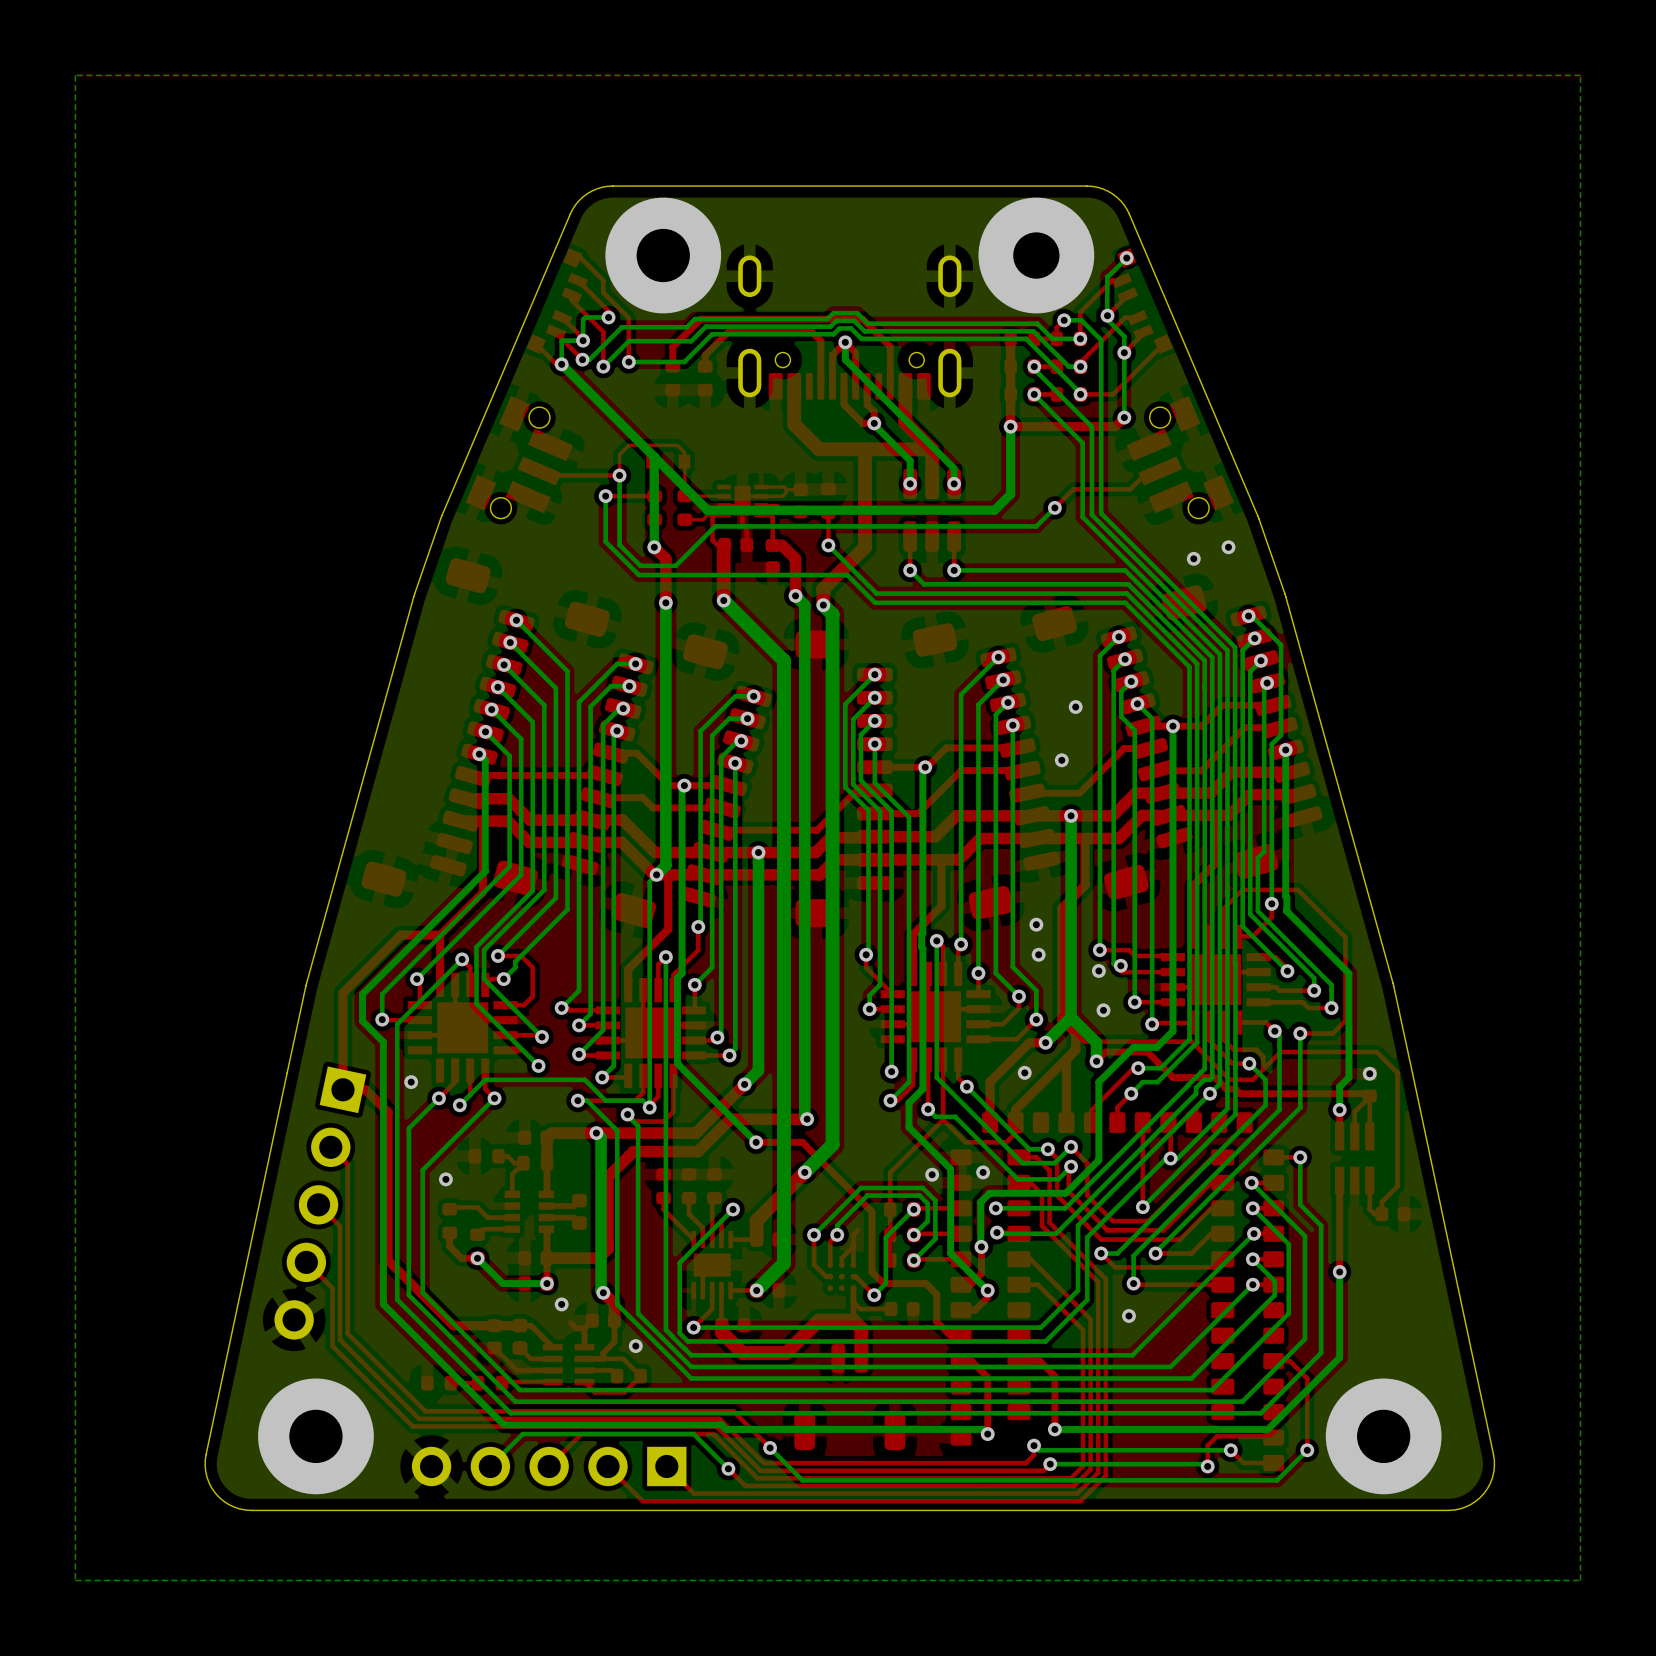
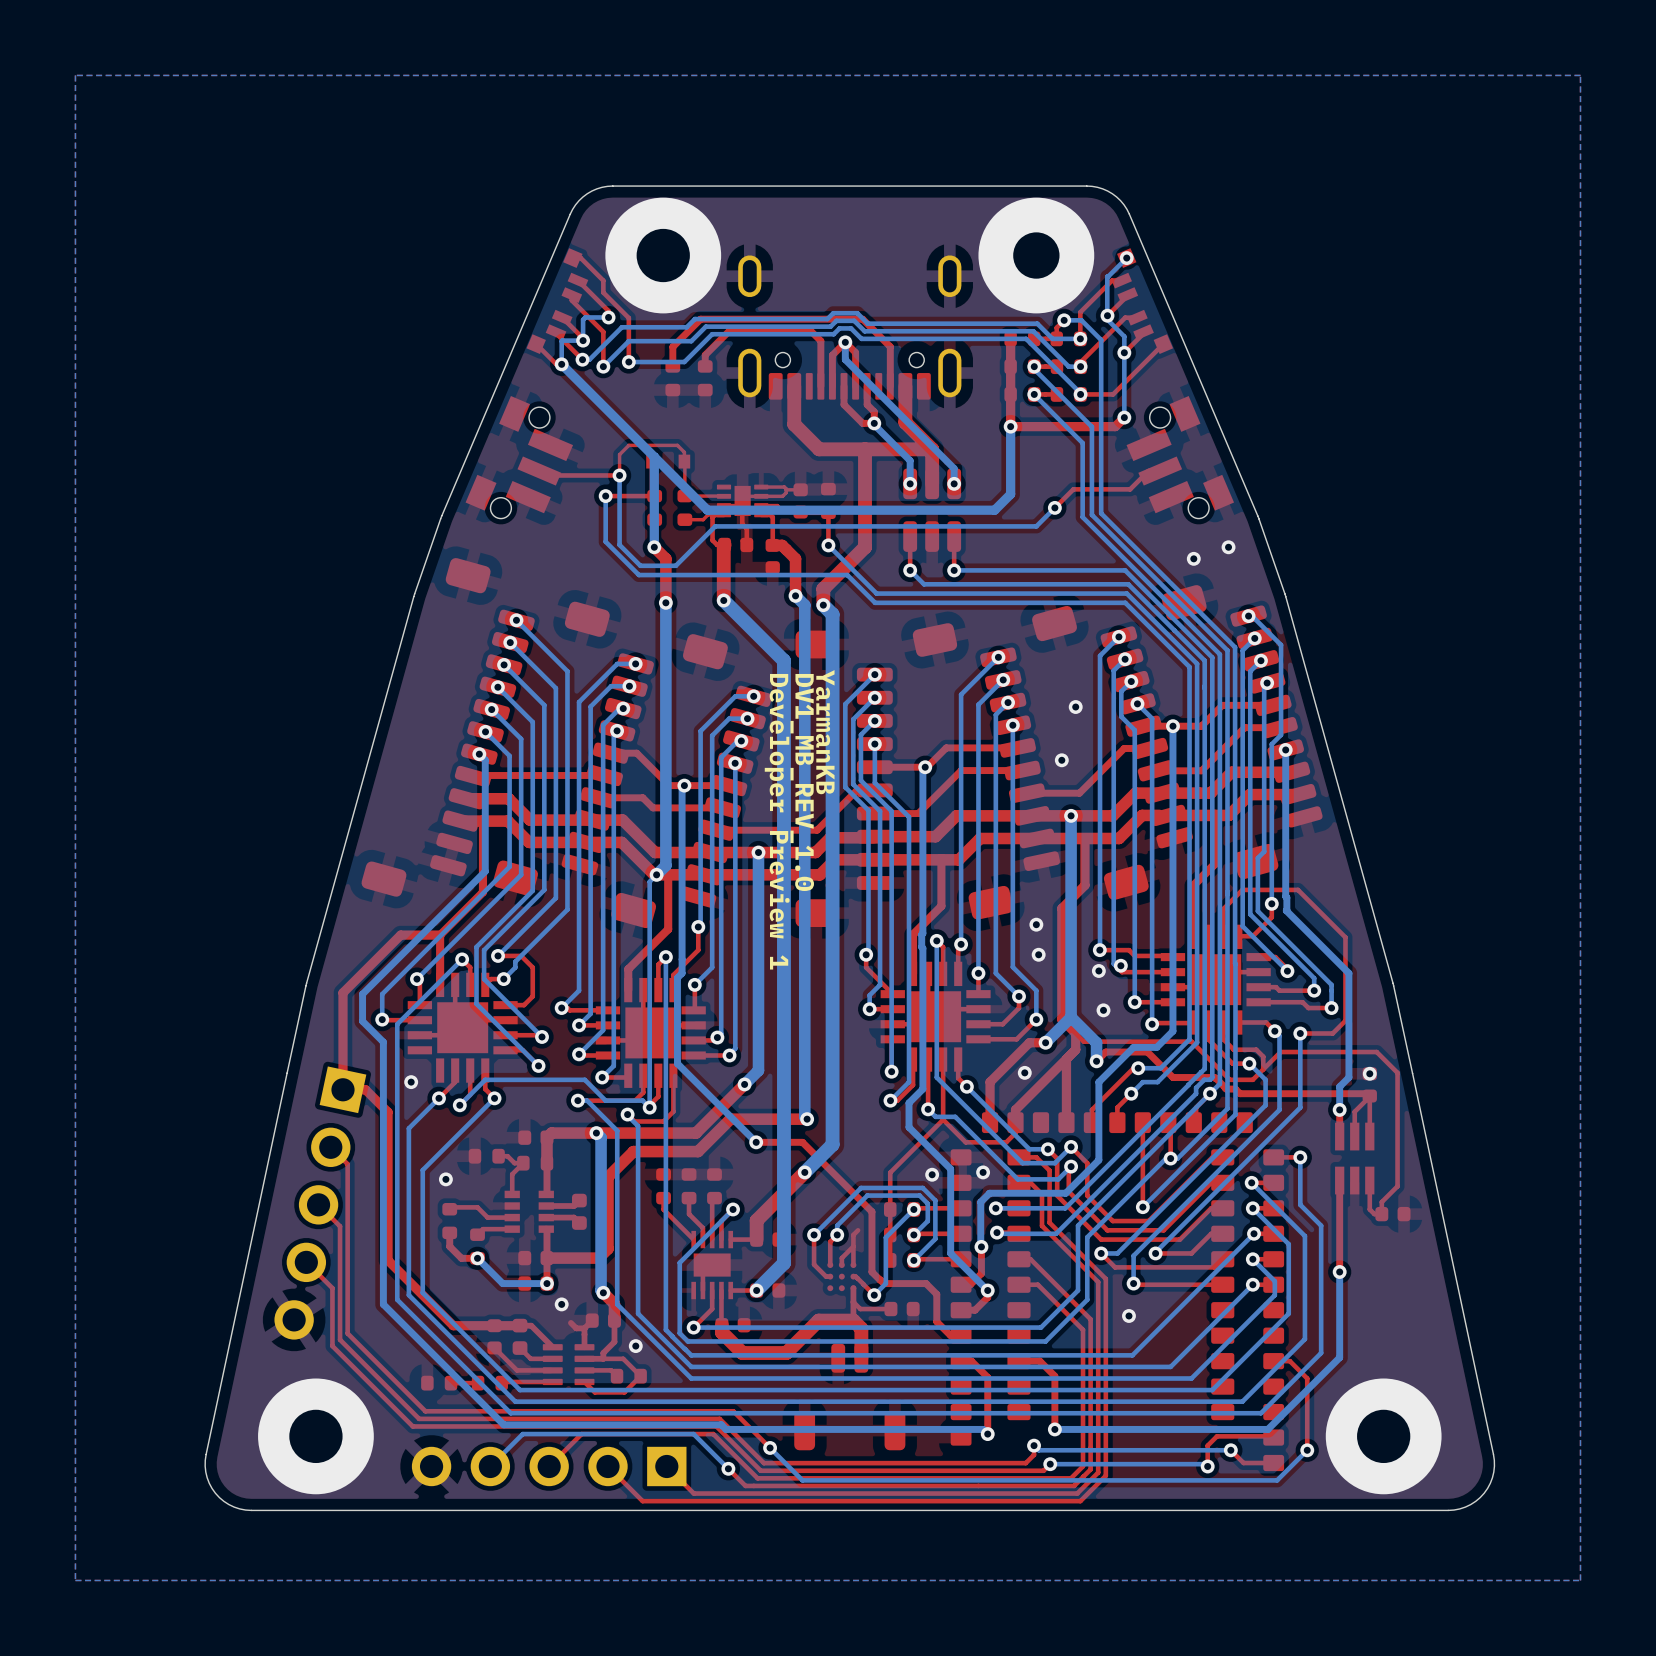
text: none -> YarmanKB (825, 732)
text: none -> DV1_MB_REV_1.0 (802, 782)
text: none -> Developer Preview 1 (777, 821)

